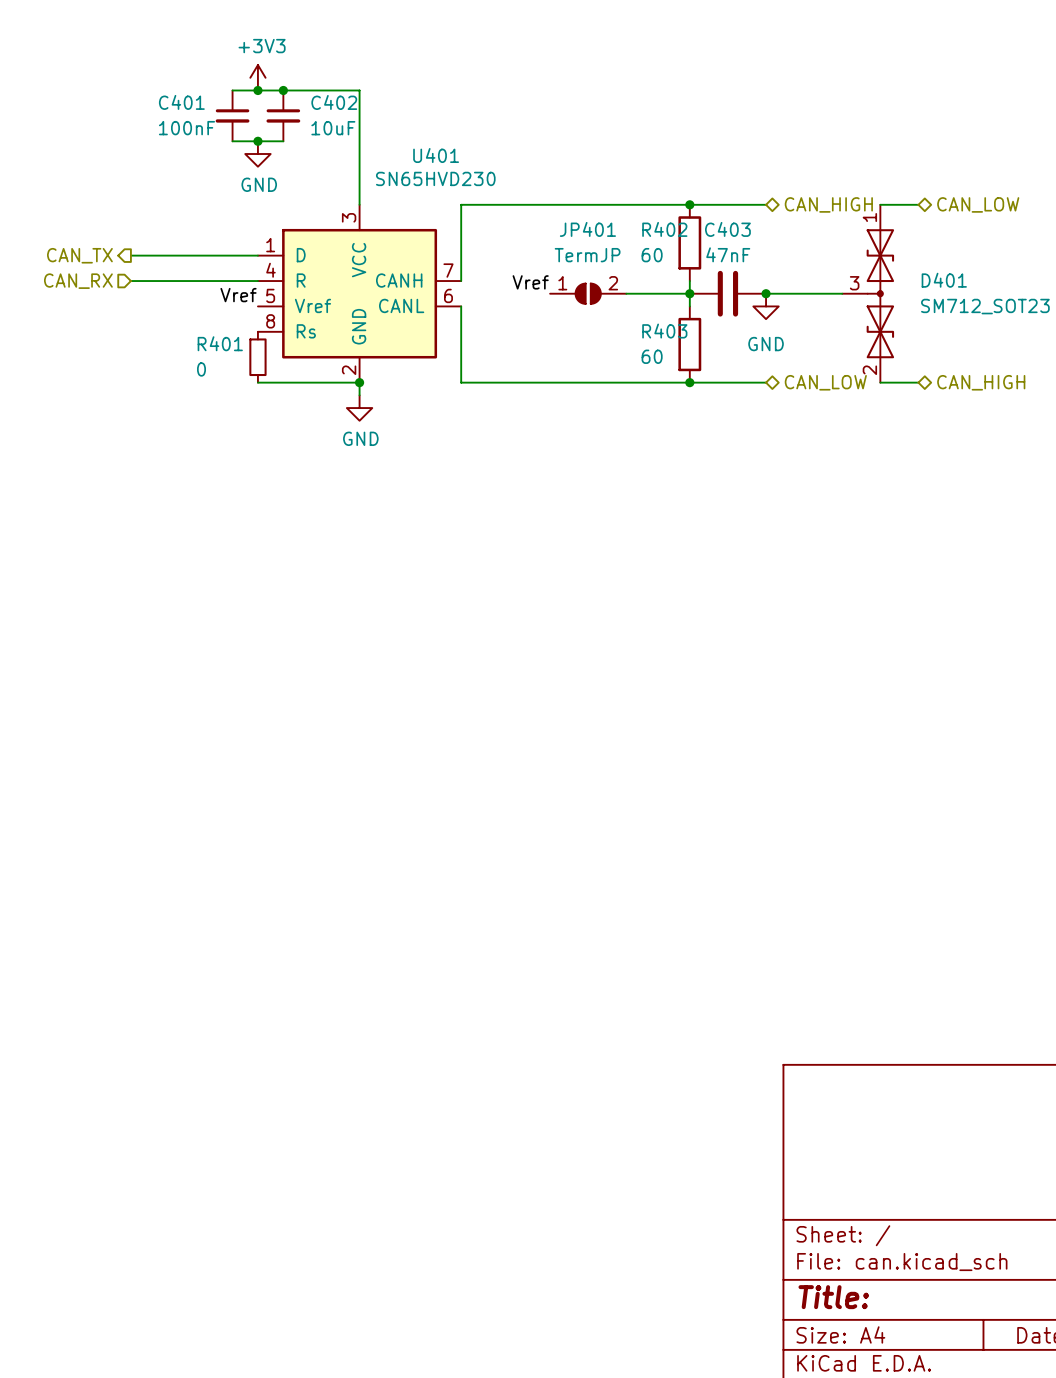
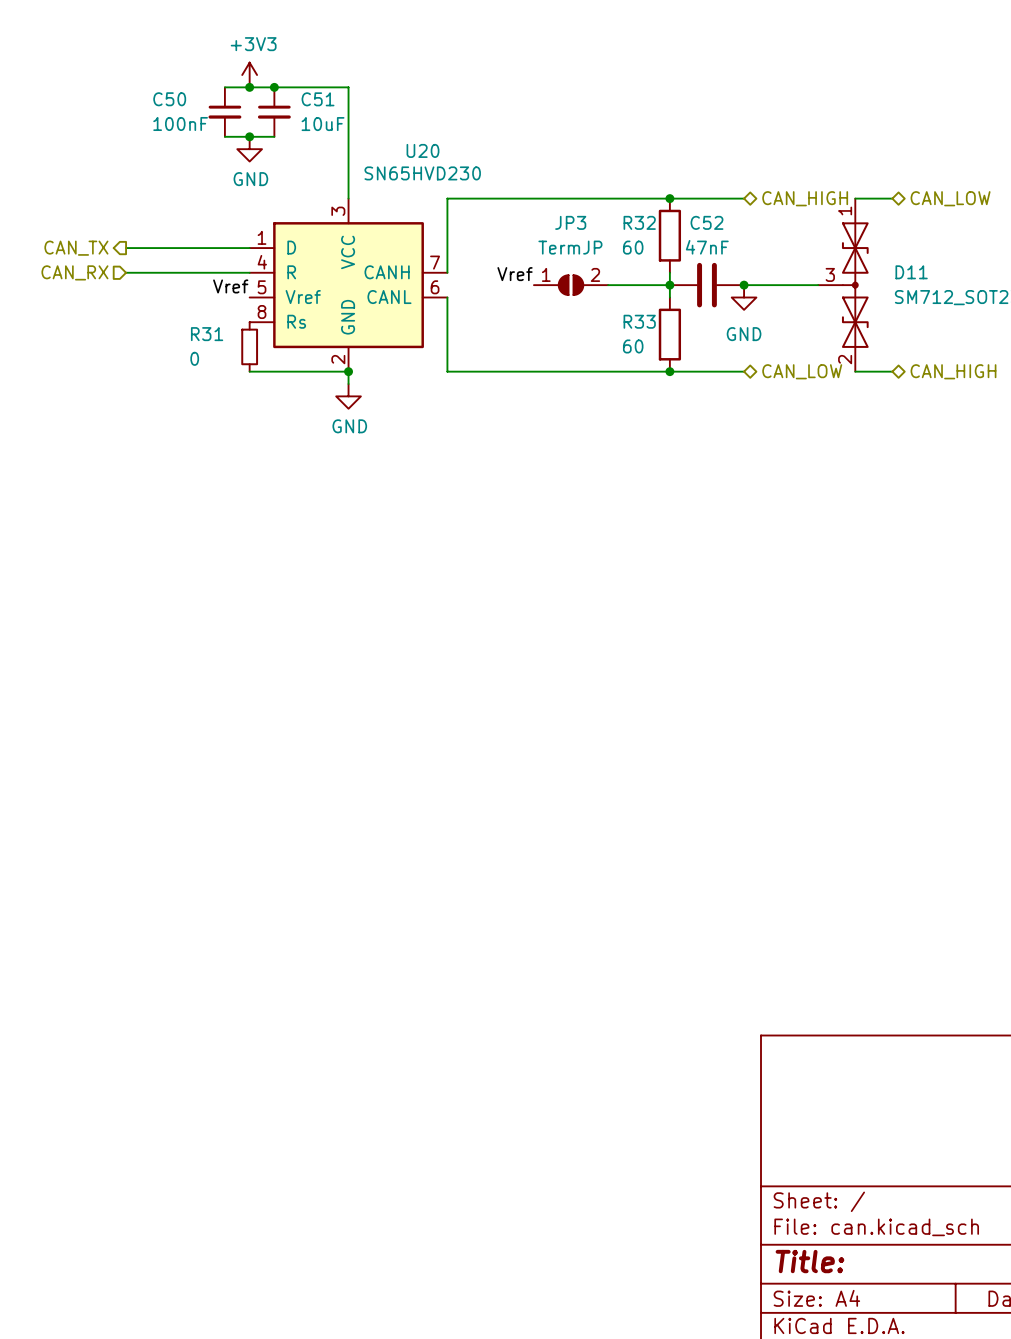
C401 name: C401 (181, 102) -> C50 (169, 99)
C402 name: C402 (334, 102) -> C51 (318, 99)
U401 name: U401 (436, 155) -> U20 (422, 150)
JP401 name: JP401 (587, 229) -> JP3 (570, 222)
R402 name: R402 (664, 229) -> R32 (639, 222)
C403 name: C403 (727, 229) -> C52 (706, 222)
D401 name: D401 (944, 280) -> D11 (911, 272)
R403 name: R403 (664, 331) -> R33 (639, 321)
R401 name: R401 (220, 343) -> R31 (207, 334)

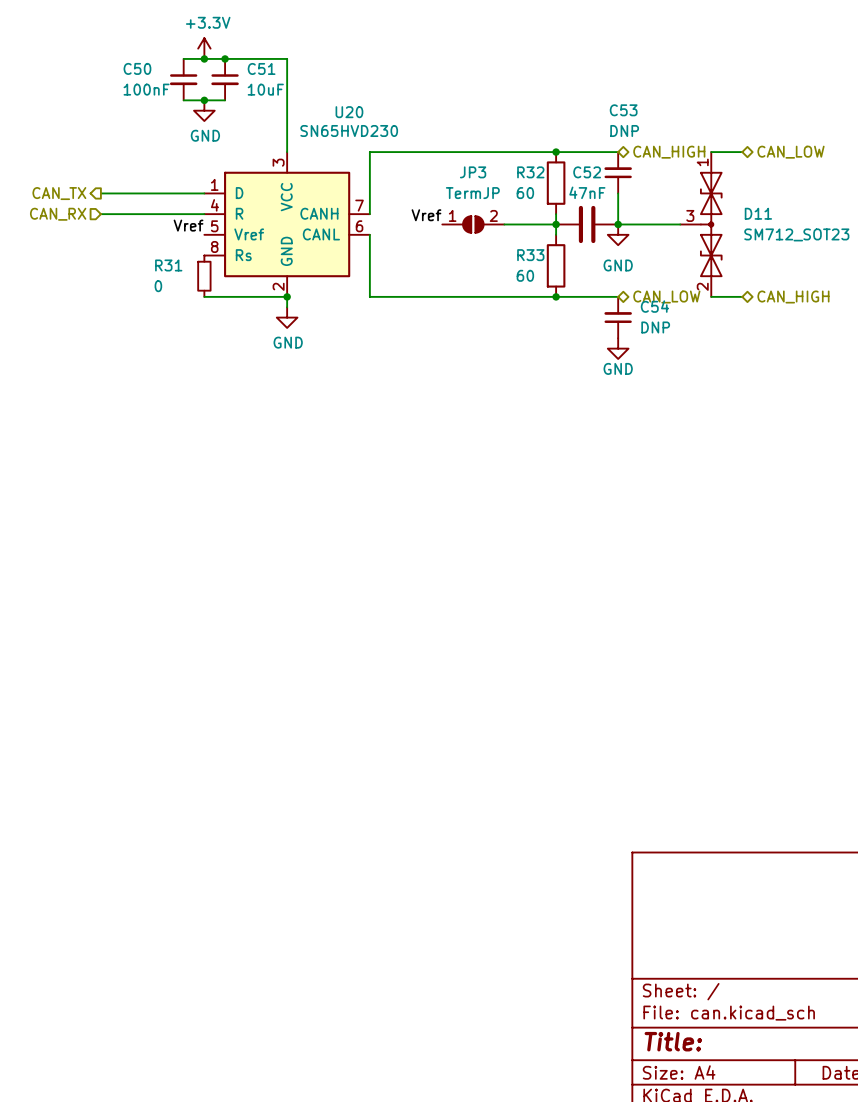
power symbol: +3V3 (249, 75) -> +3.3V (204, 48)
C53: none -> DNP (618, 172)
wire: none -> (618, 193) (618, 224)
C54: none -> DNP (618, 317)
power symbol: none -> GND (618, 348)

